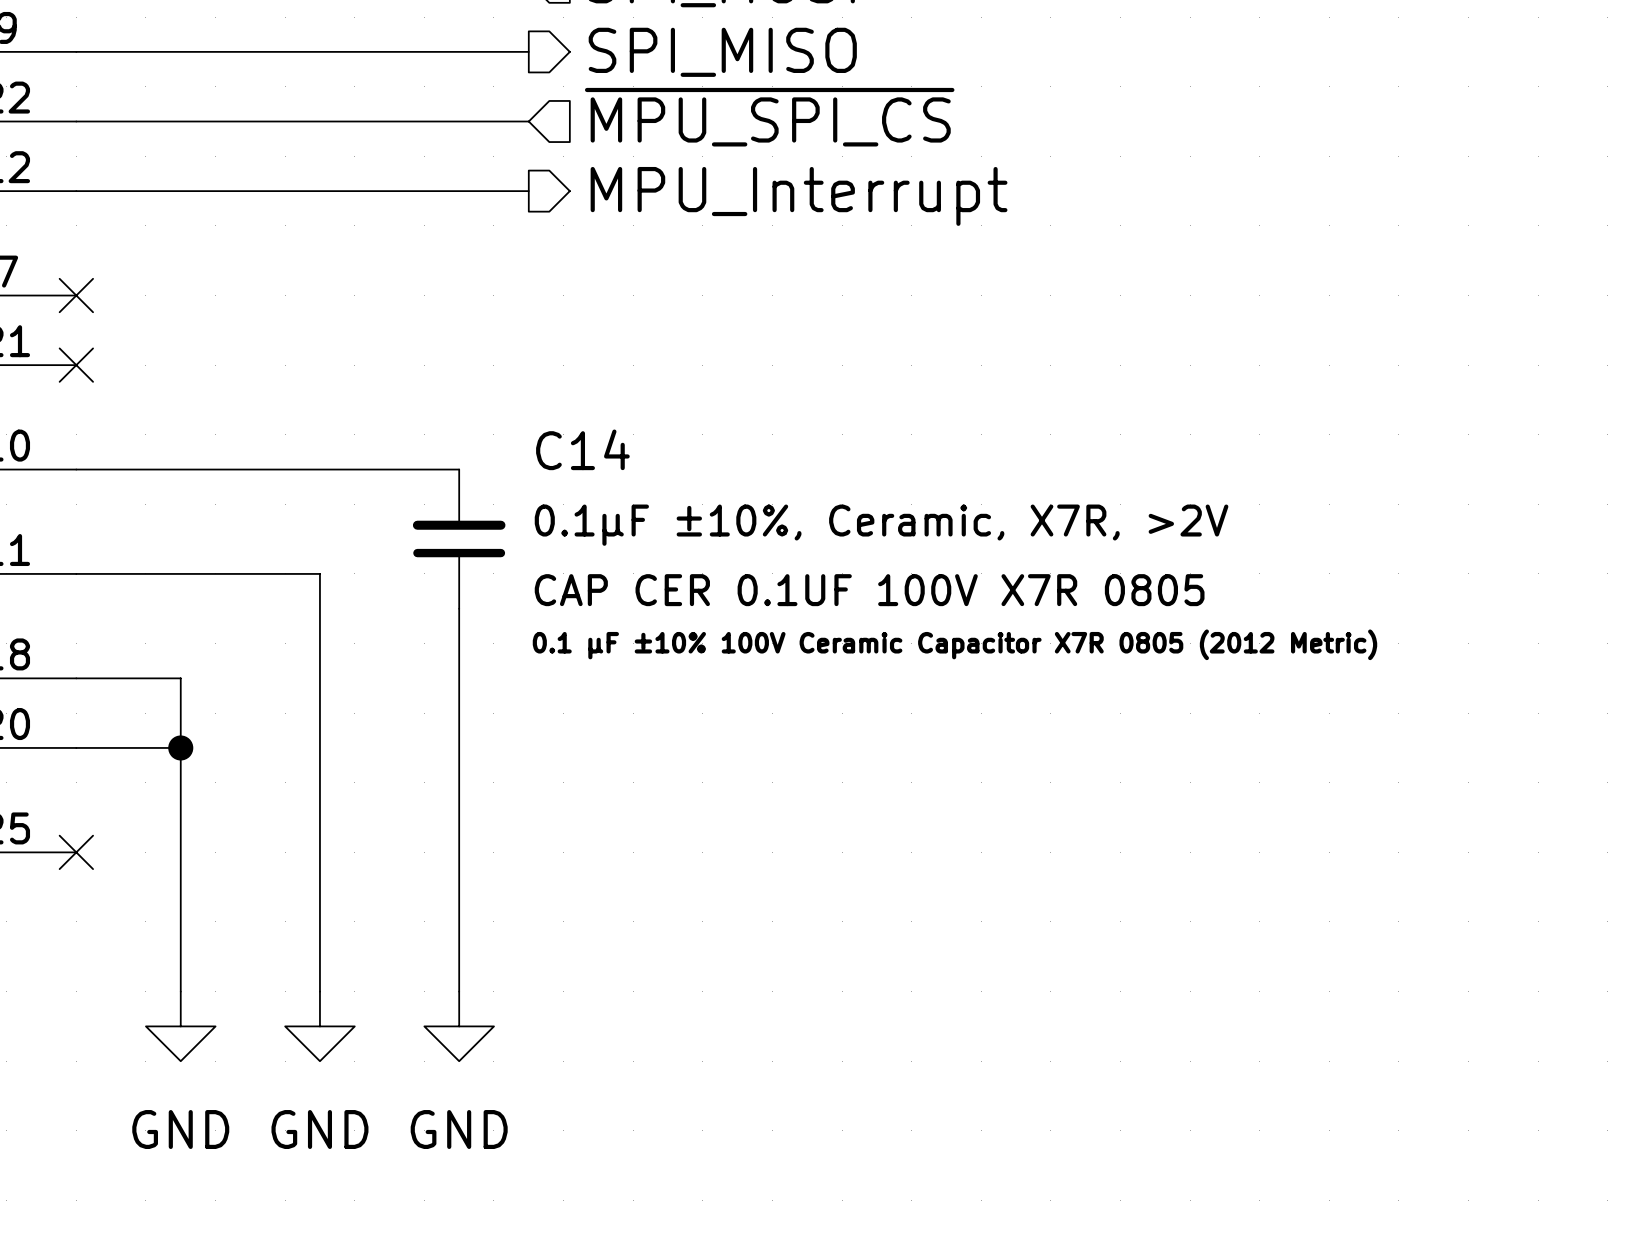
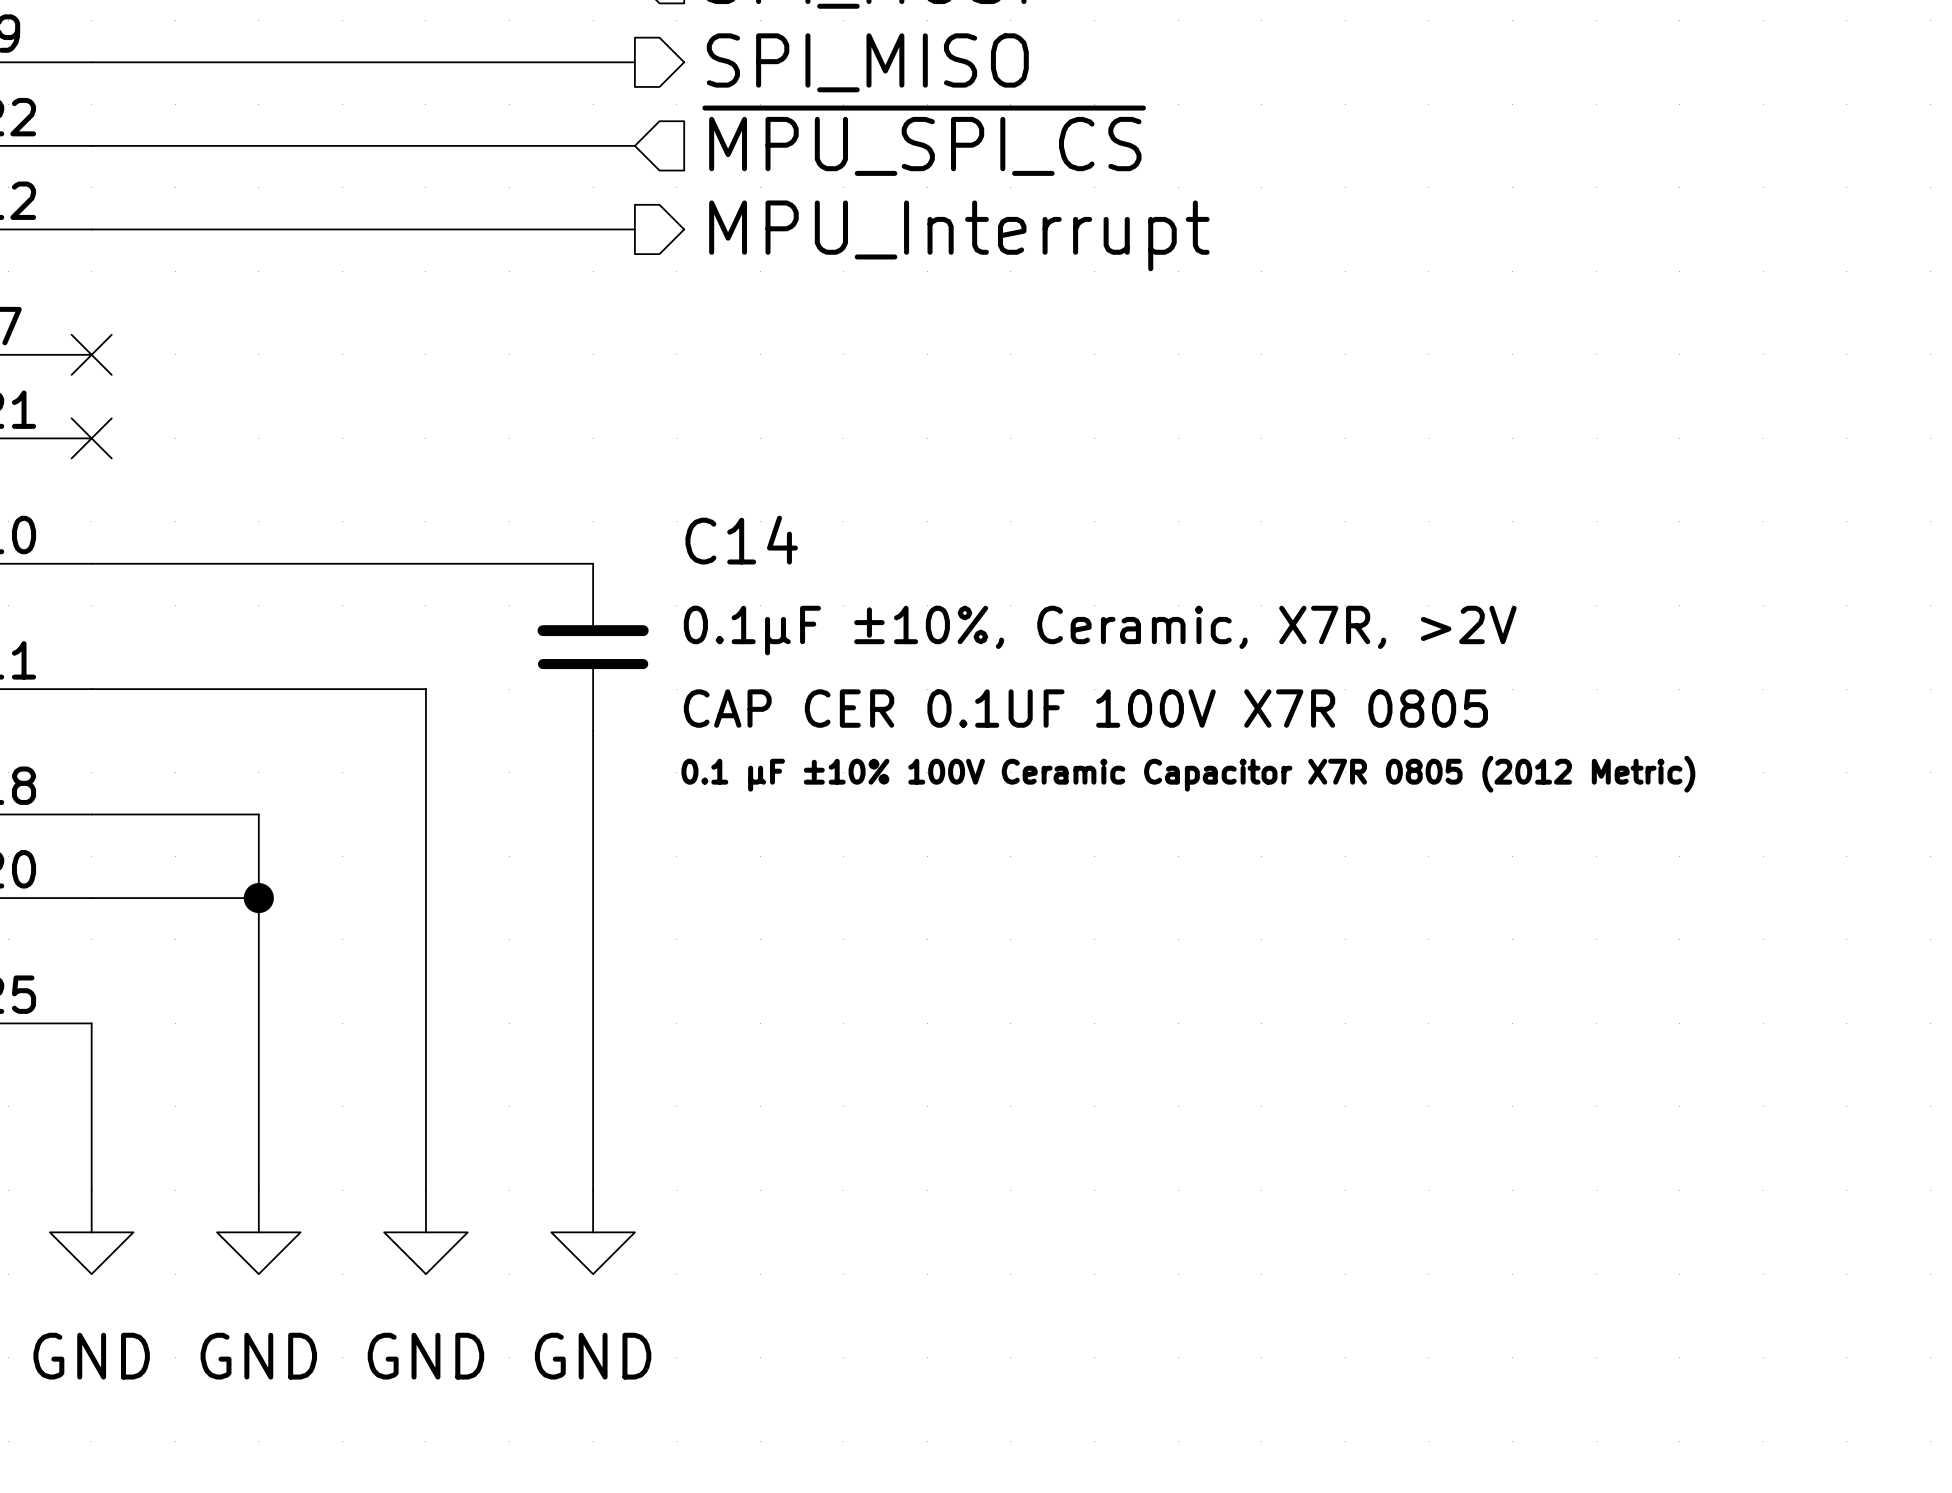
wire: none -> (551, 563) (593, 563)
C14 position: (459, 539) -> (593, 647)
wire: (319, 573) (319, 991) -> (384, 689) (425, 689) (425, 1190)
wire: (459, 608) (459, 991) -> (593, 730) (593, 1190)
wire: (180, 678) (180, 991) -> (217, 814) (258, 814) (258, 1190)
wire: none -> (217, 898) (258, 898)
junction position: (180, 747) -> (258, 898)
wire: none -> (91, 1023) (91, 1190)
no-connect mark: (76, 852) -> none
power symbol: none -> GND (91, 1232)
power symbol position: GND (180, 1026) -> GND (258, 1232)
power symbol position: GND (319, 1026) -> GND (425, 1232)
power symbol position: GND (459, 1026) -> GND (593, 1232)

